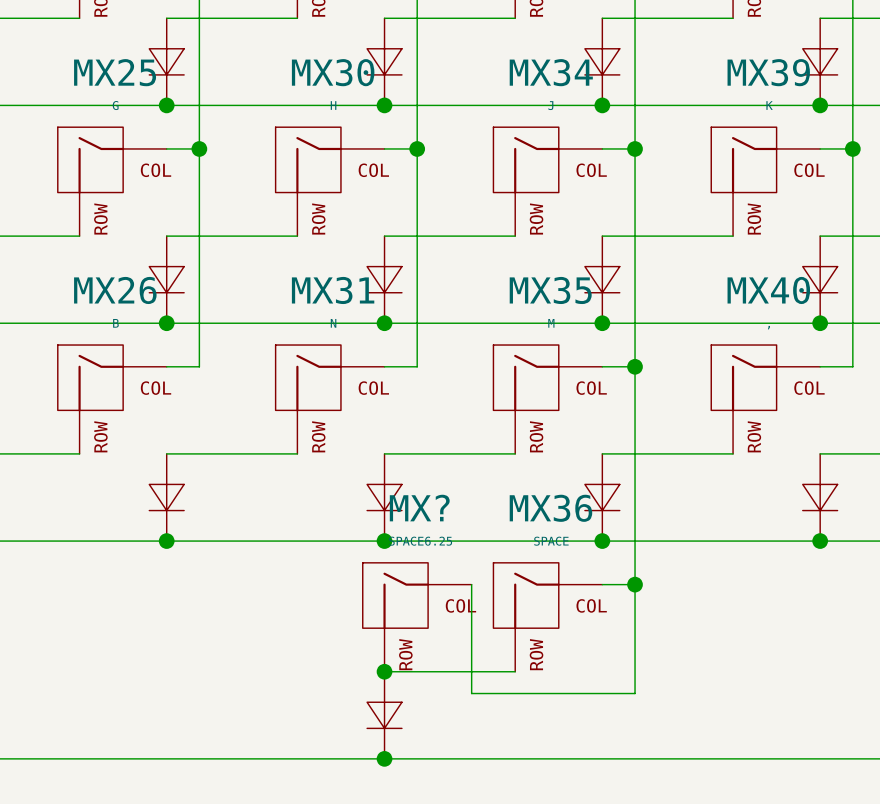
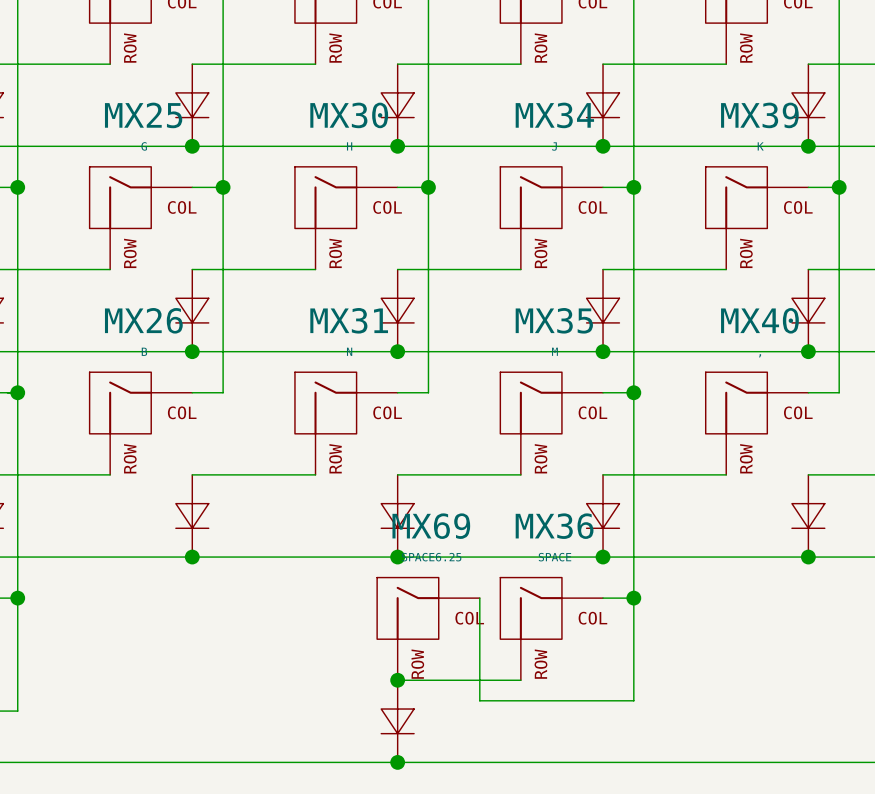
MX? name: MX? (419, 508) -> MX69 (431, 526)

